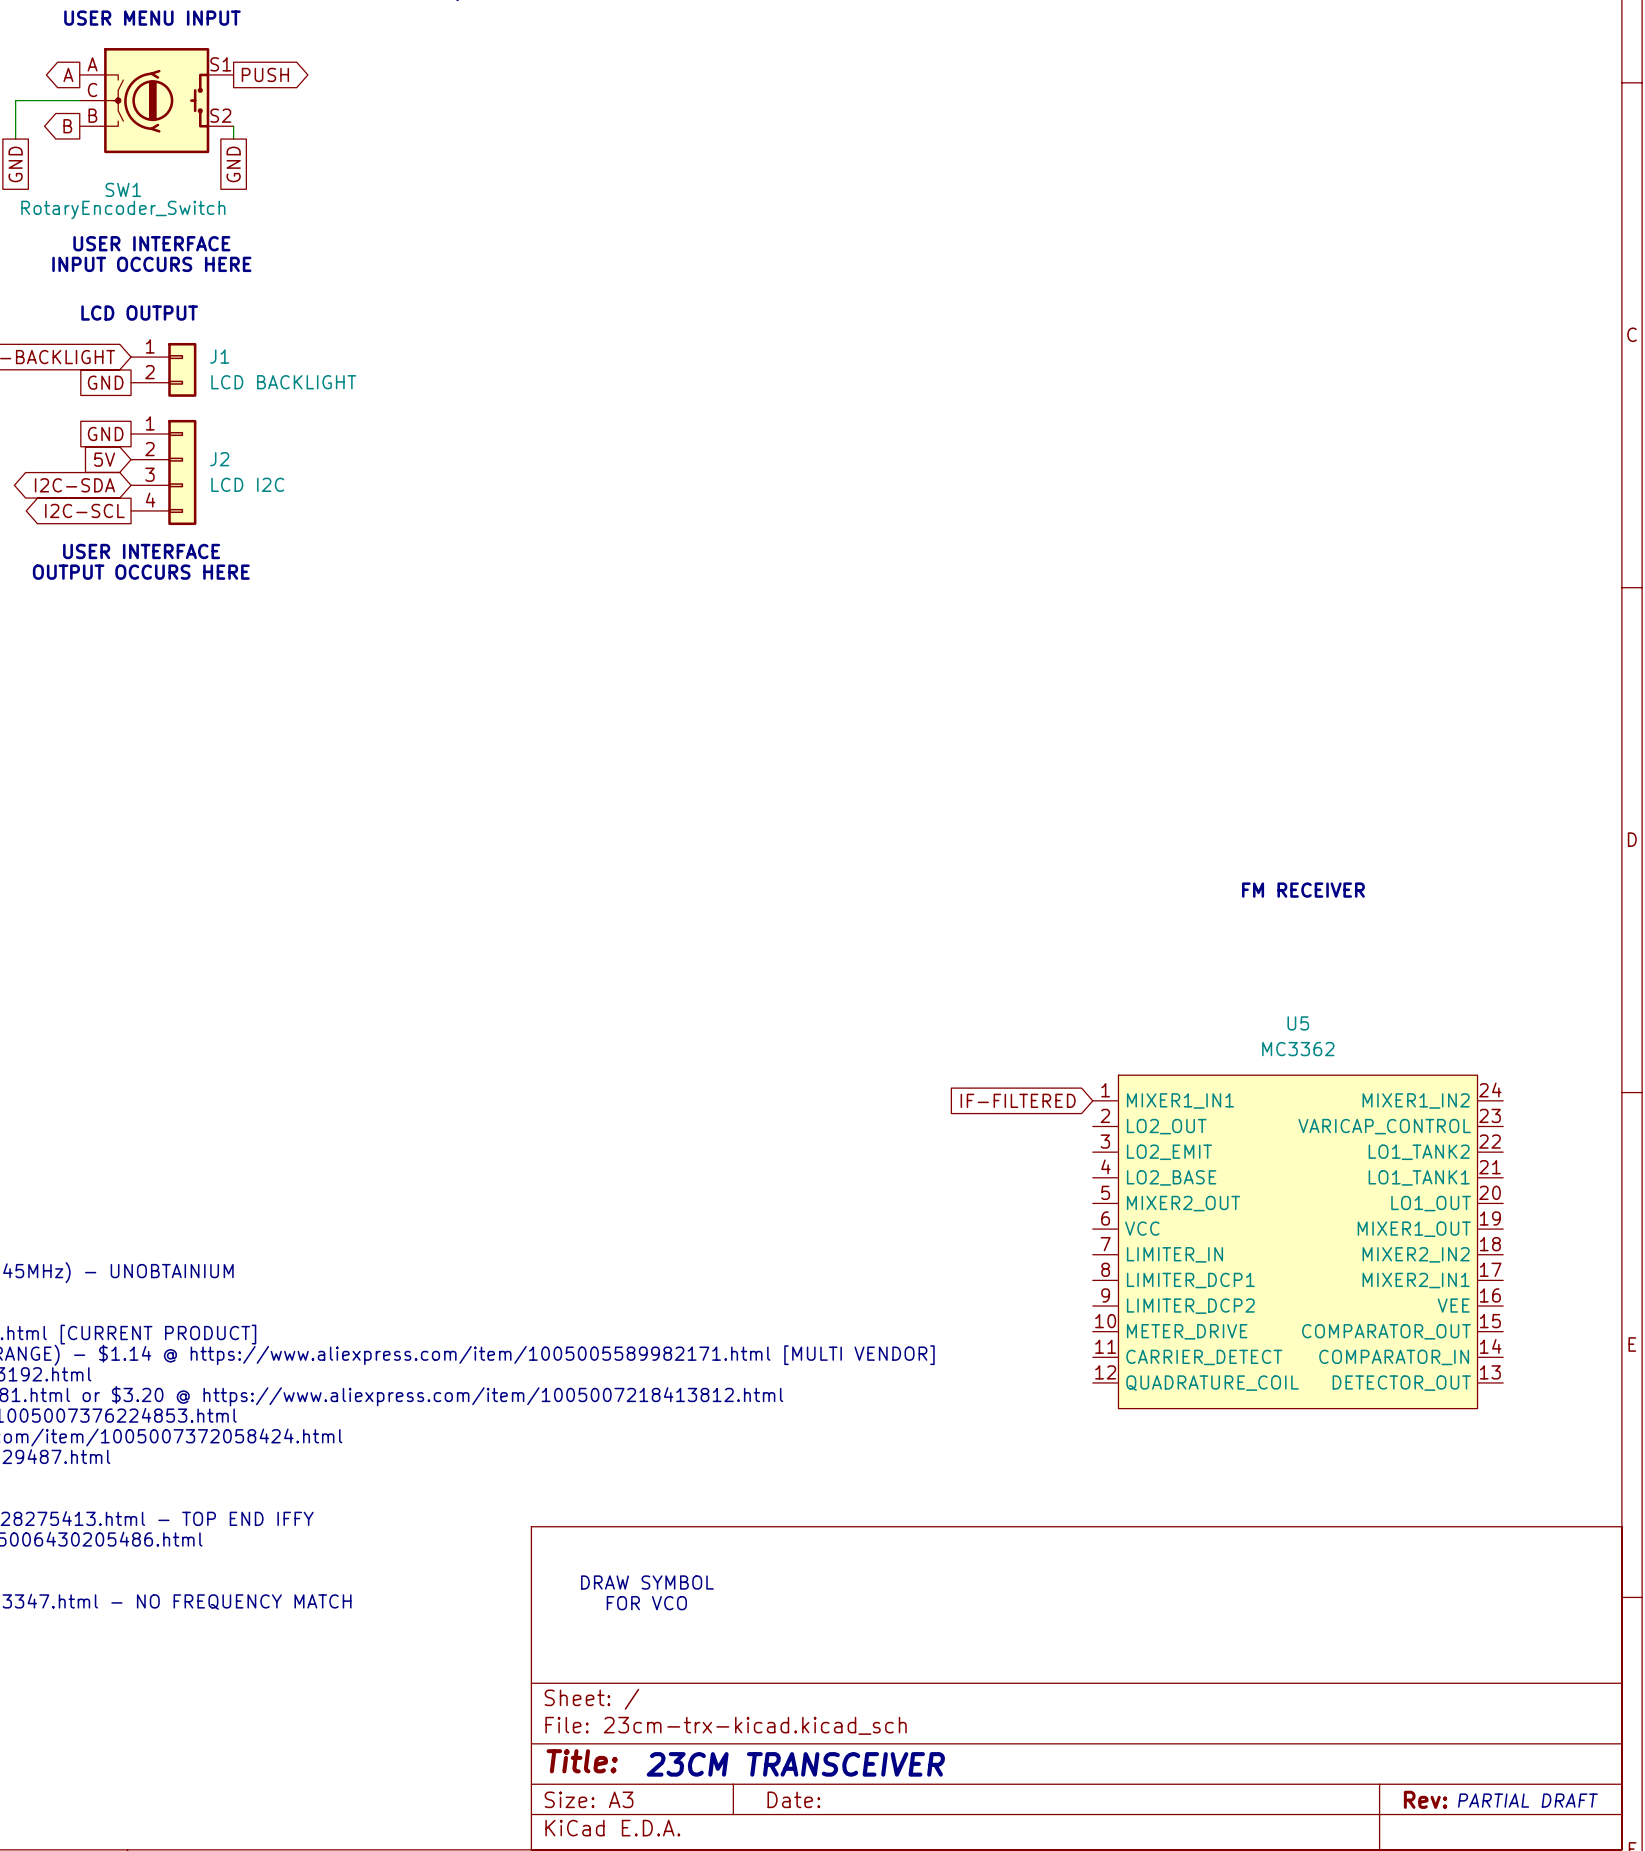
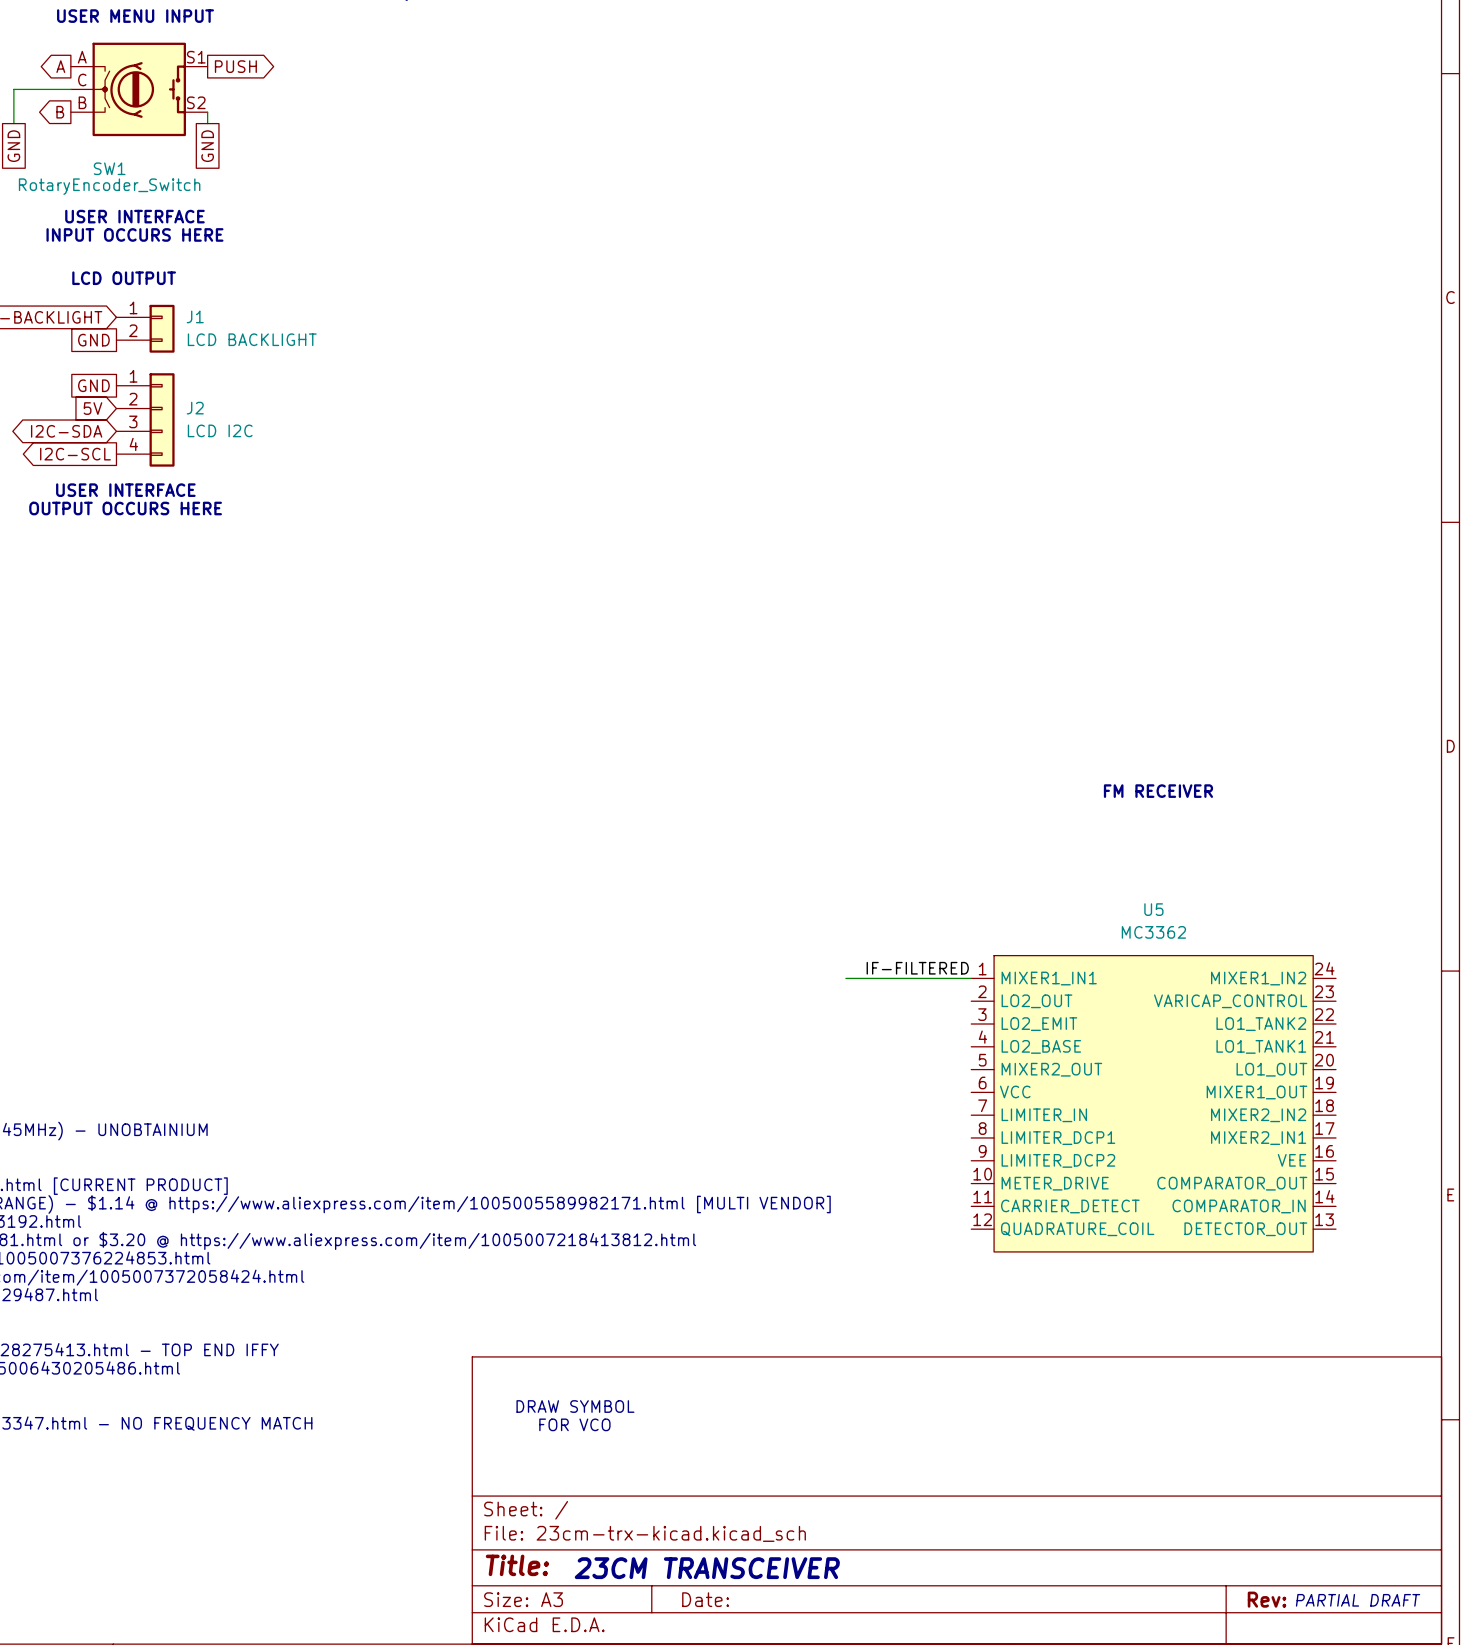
label: none -> IF-FILTERED (917, 968)
wire: none -> (845, 978) (971, 978)
global label: IF-FILTERED (1018, 1100) -> none

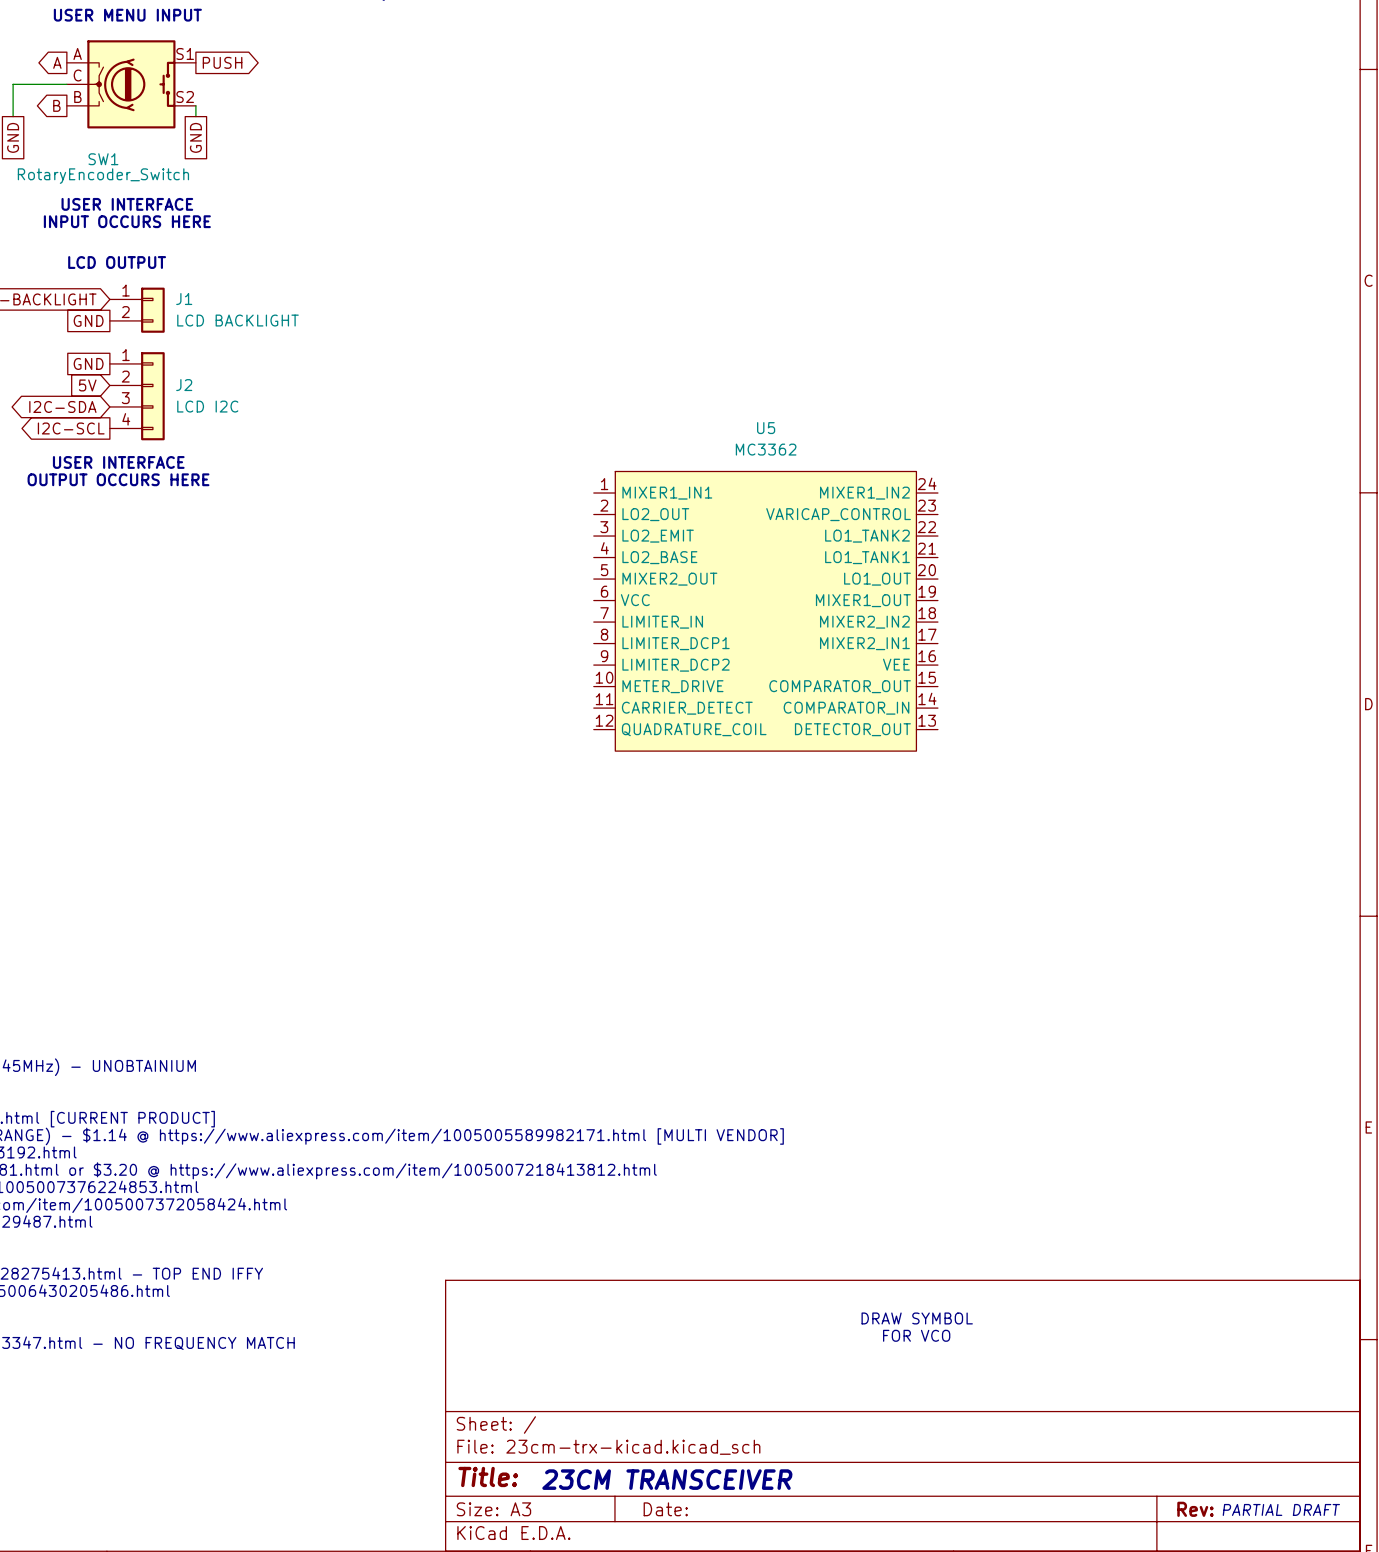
text: FM RECEIVER (1158, 791) -> none
label: IF-FILTERED (917, 968) -> none
wire: (845, 978) (971, 978) -> none
U5 position: (1153, 1103) -> (765, 611)
text: none -> DRAW SYMBOL (917, 1318)
text: DRAW SYMBOL (575, 1406) -> none
text: none -> FOR VCO (916, 1335)
text: FOR VCO (574, 1424) -> none

